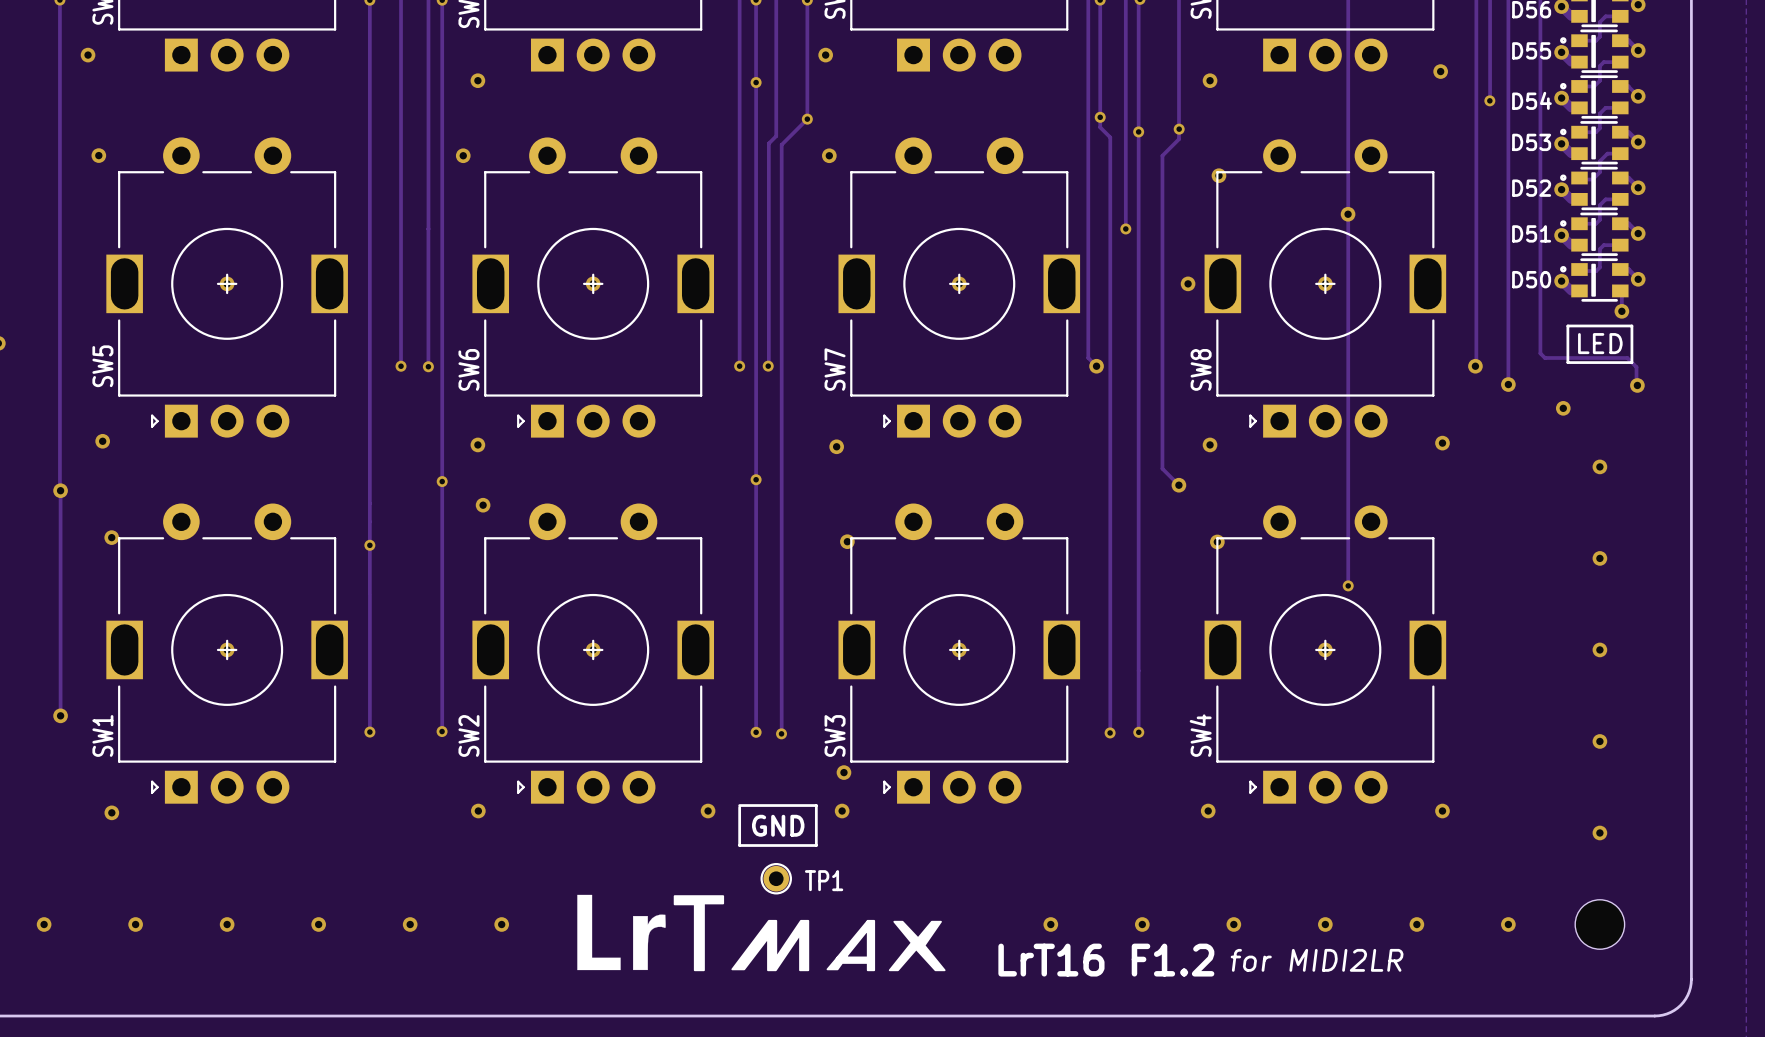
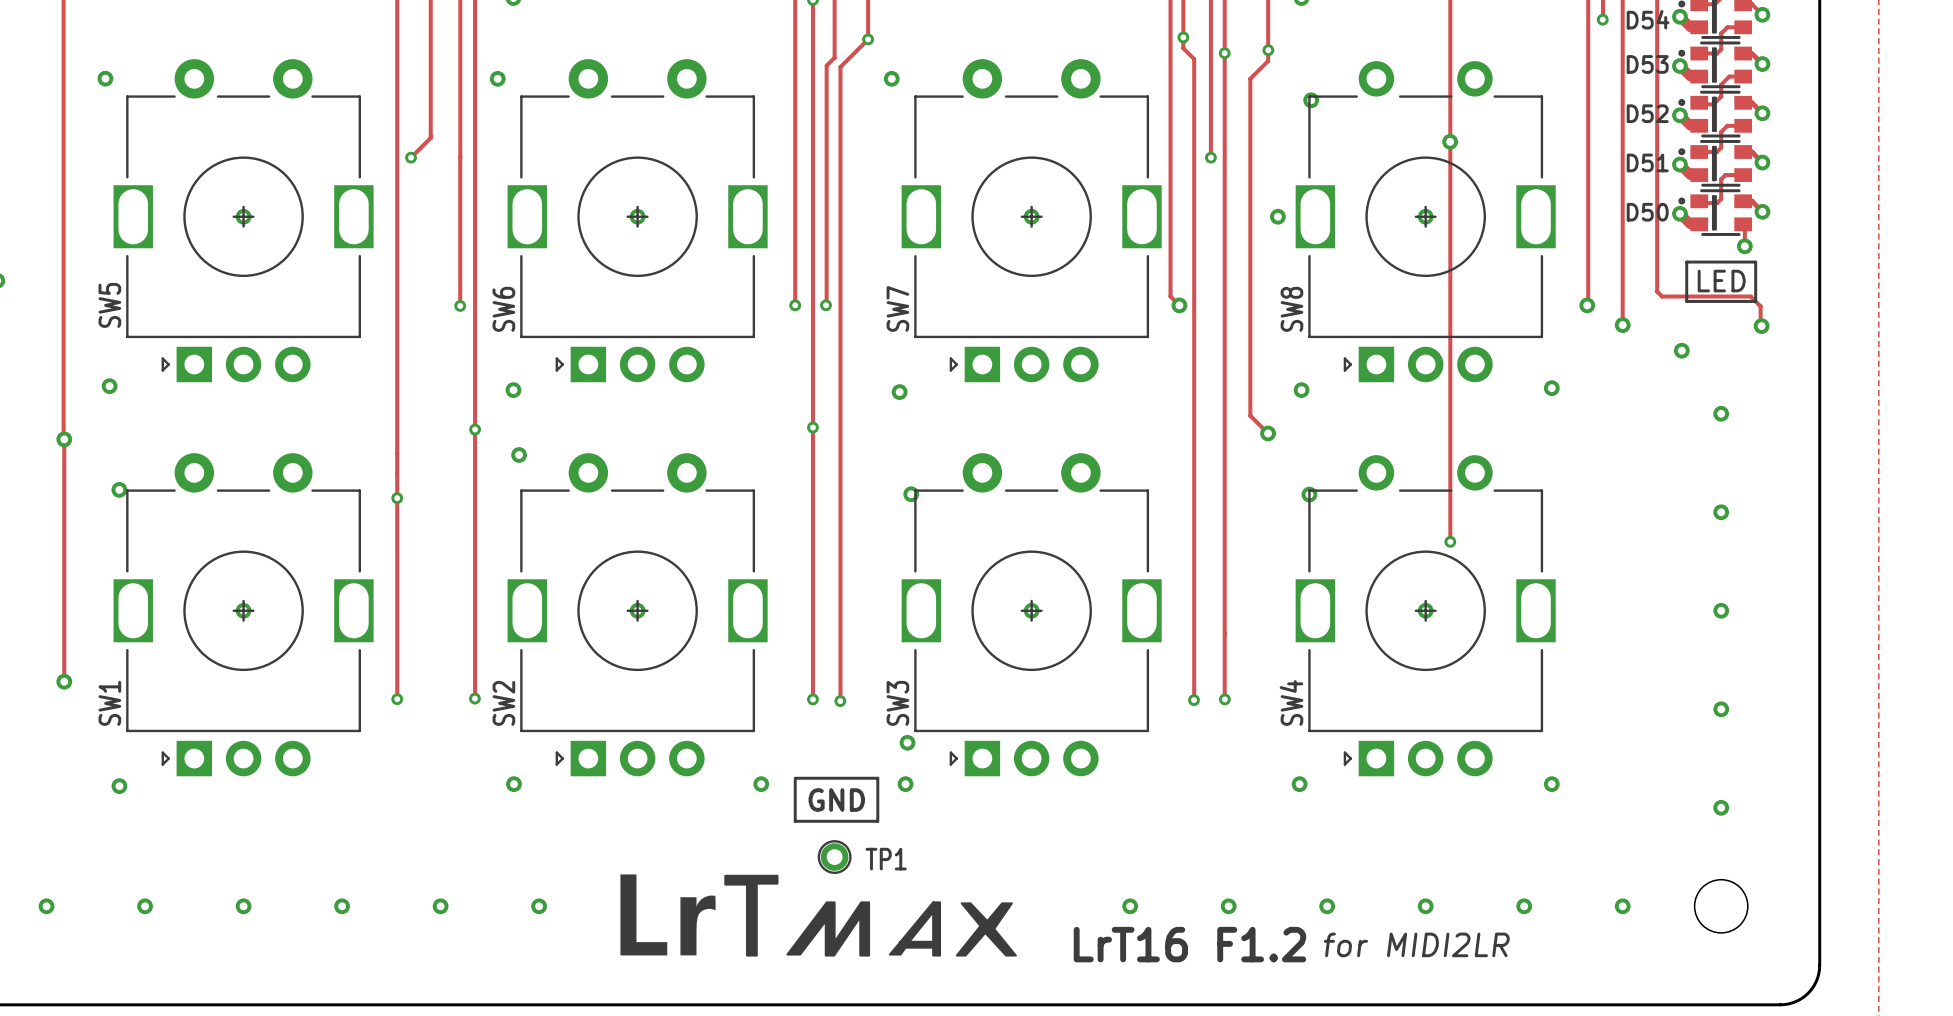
track: (401, 210) (401, 366) -> (430, 137) (411, 157)
via: none -> (411, 157)
via: (401, 366) -> none

